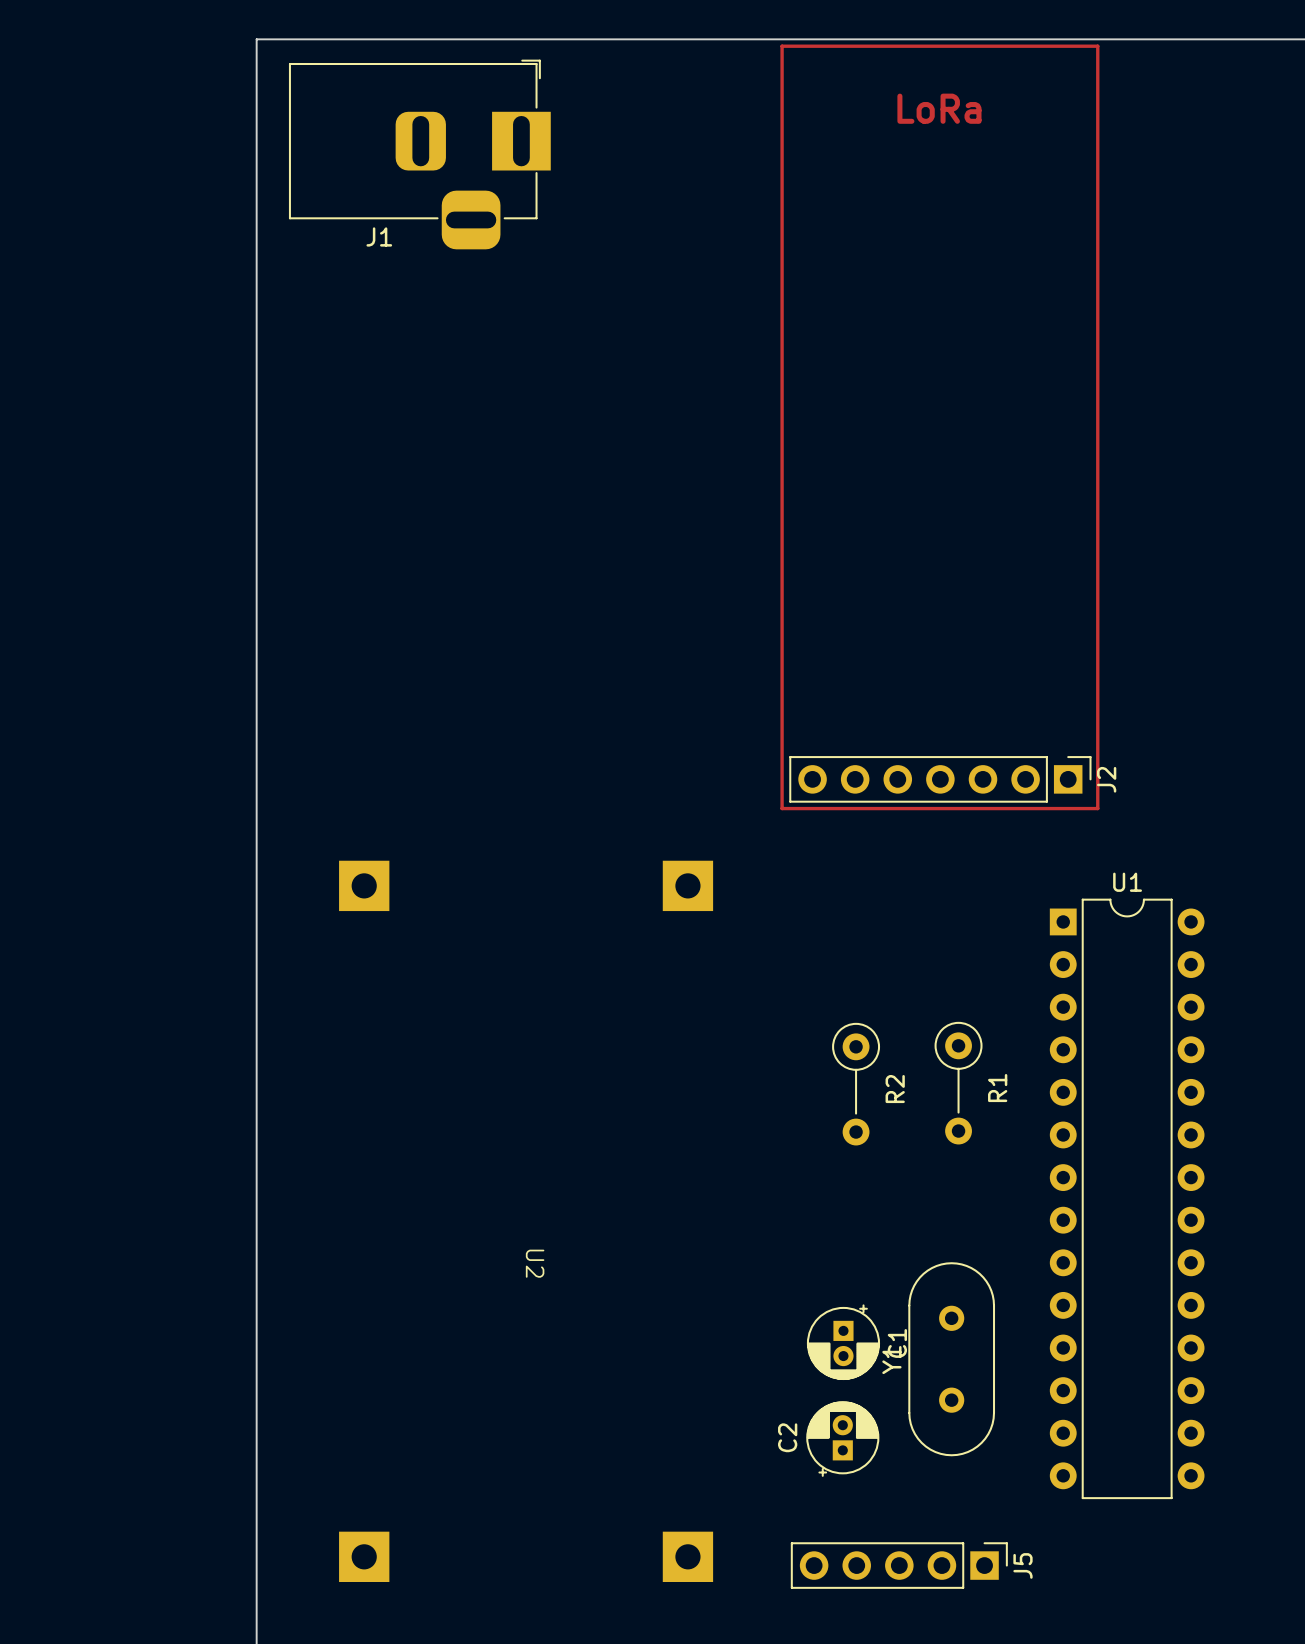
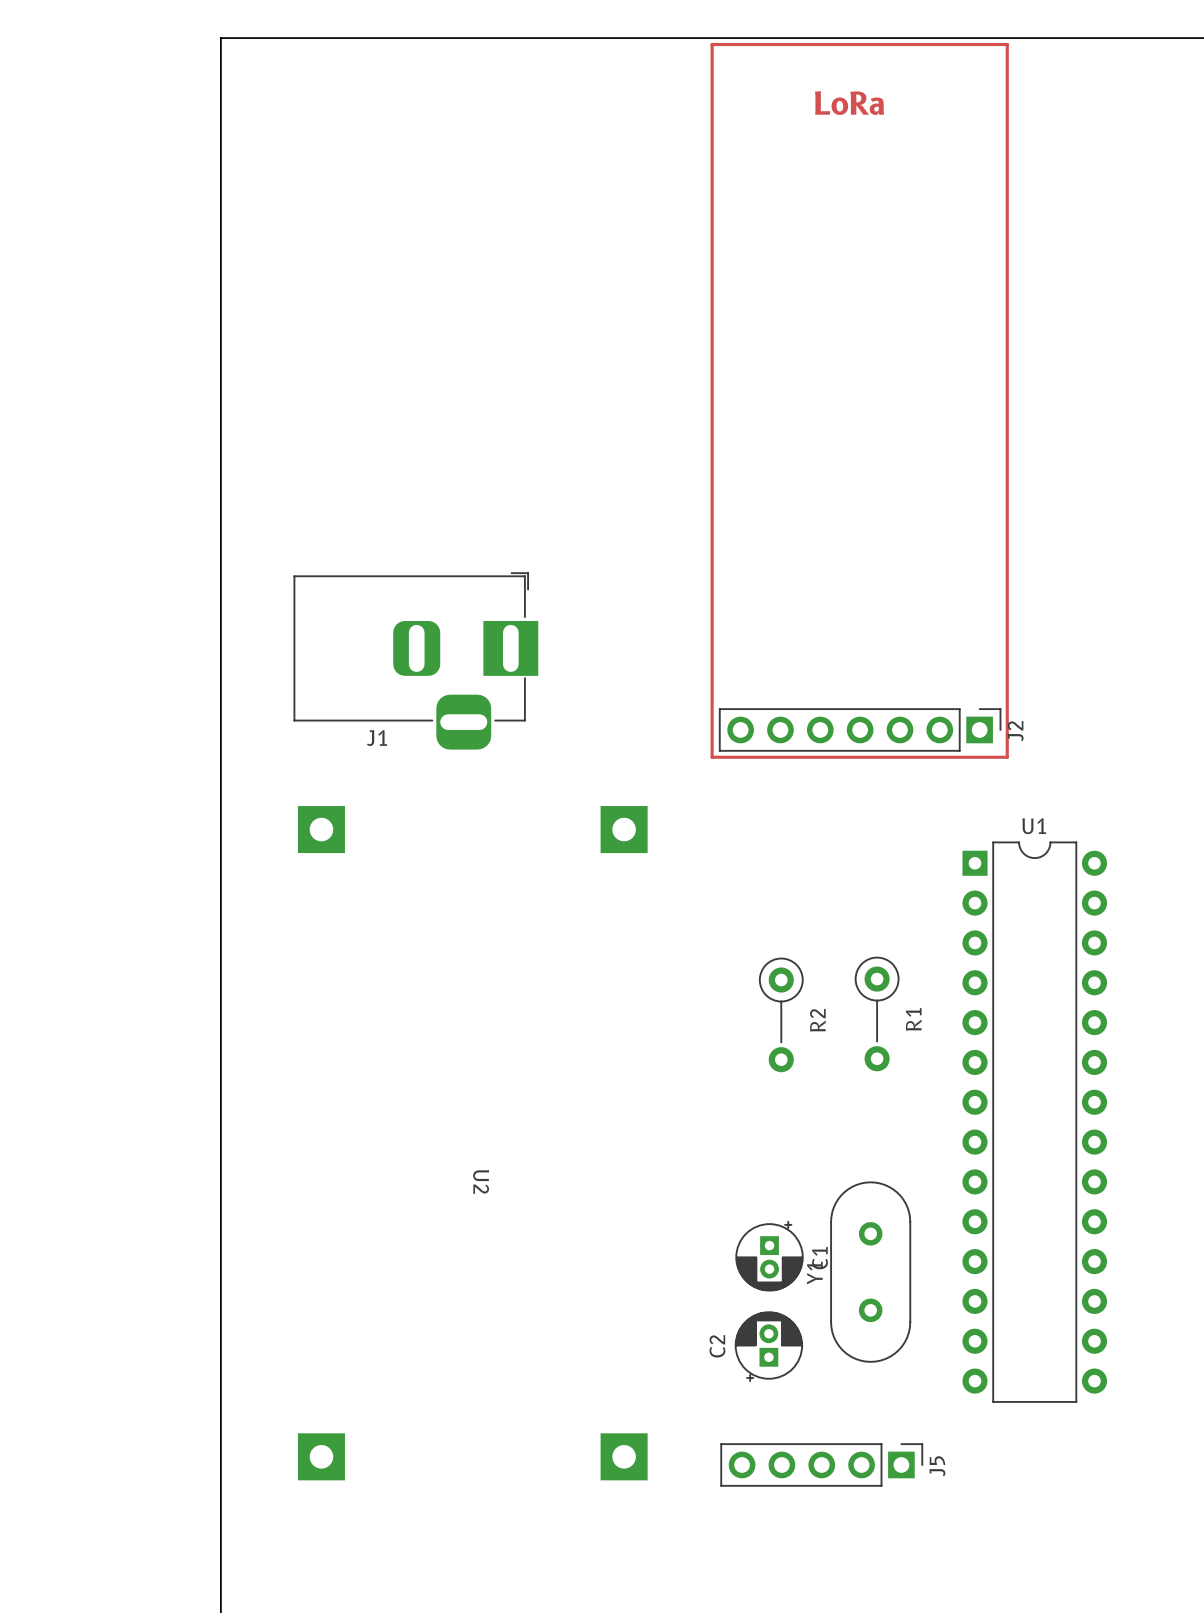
J1 position: (419, 154) -> (415, 660)

